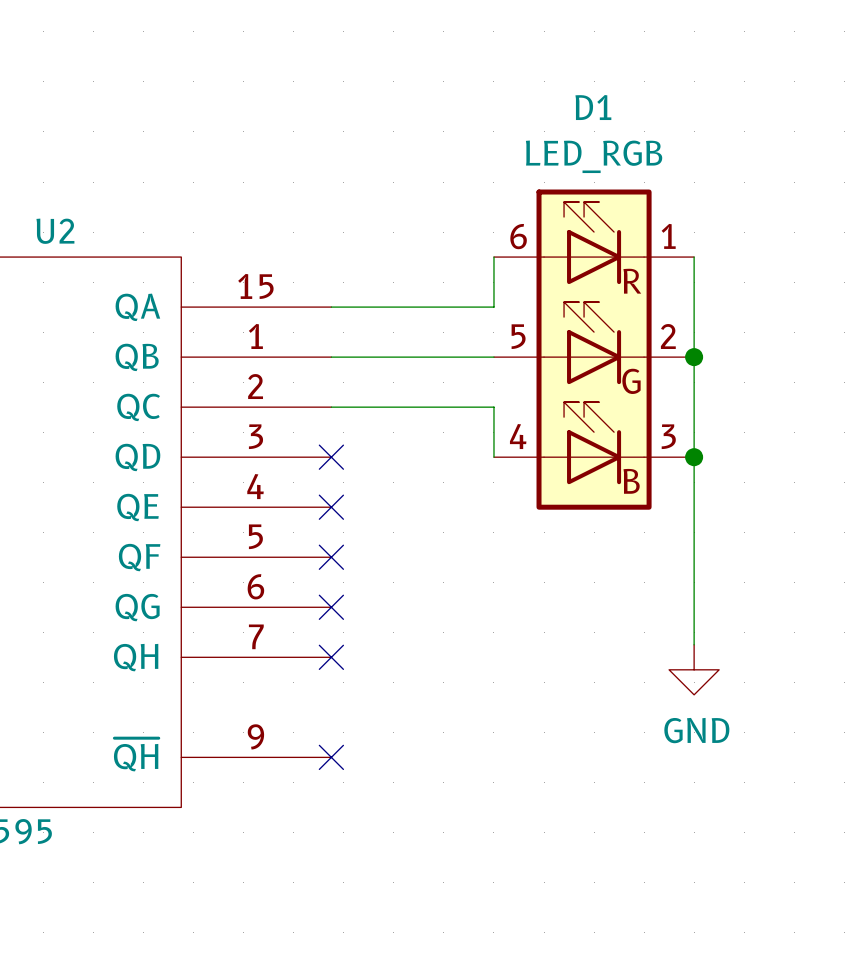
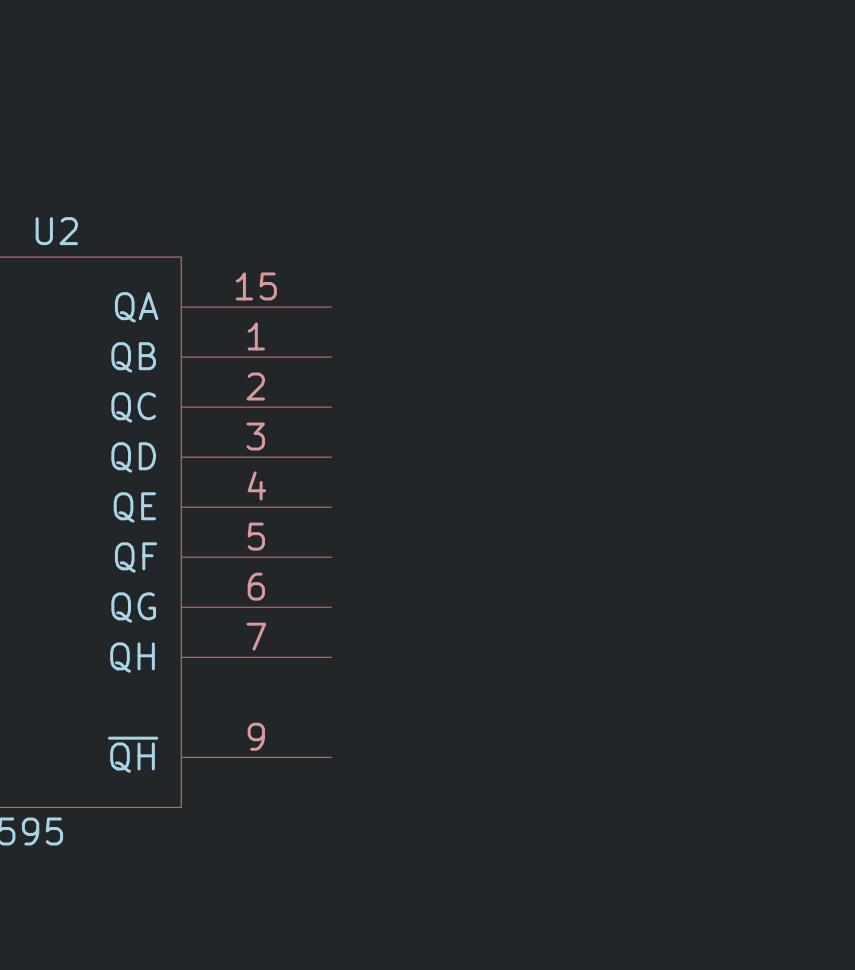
wire: (493, 257) (493, 307) (331, 307) -> none
wire: (694, 257) (694, 644) -> none
D1: LED_RGB (594, 349) -> none
wire: (331, 357) (493, 357) -> none
junction: (694, 357) -> none
wire: (331, 407) (493, 407) (493, 457) -> none
no-connect mark: (331, 457) -> none
junction: (694, 457) -> none
no-connect mark: (331, 507) -> none
no-connect mark: (331, 557) -> none
no-connect mark: (331, 607) -> none
no-connect mark: (331, 657) -> none
power symbol: GND (694, 669) -> none
no-connect mark: (331, 757) -> none

